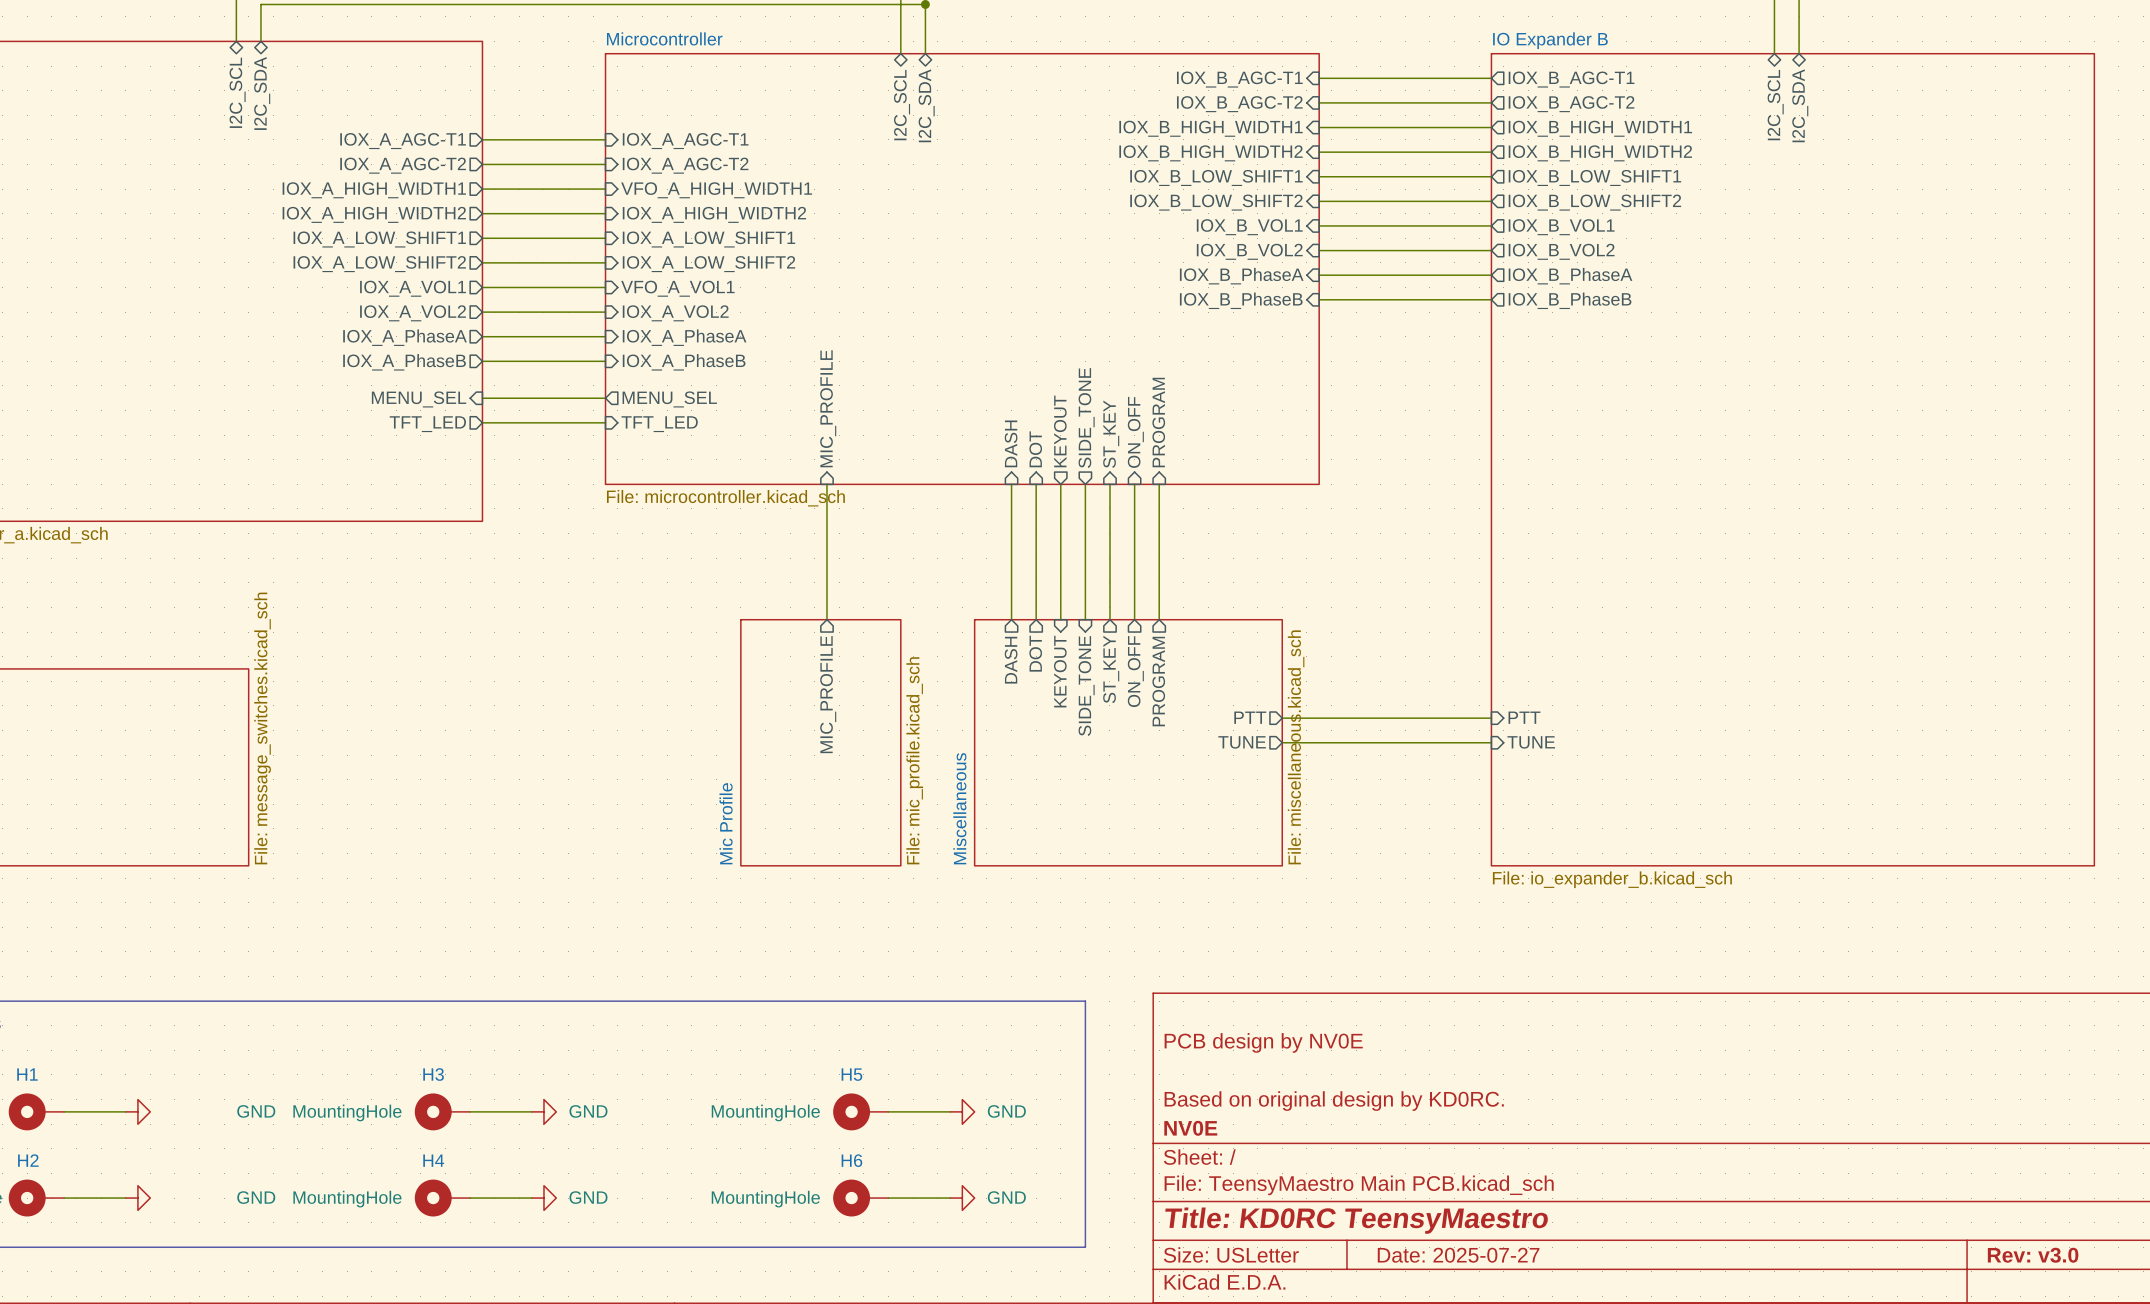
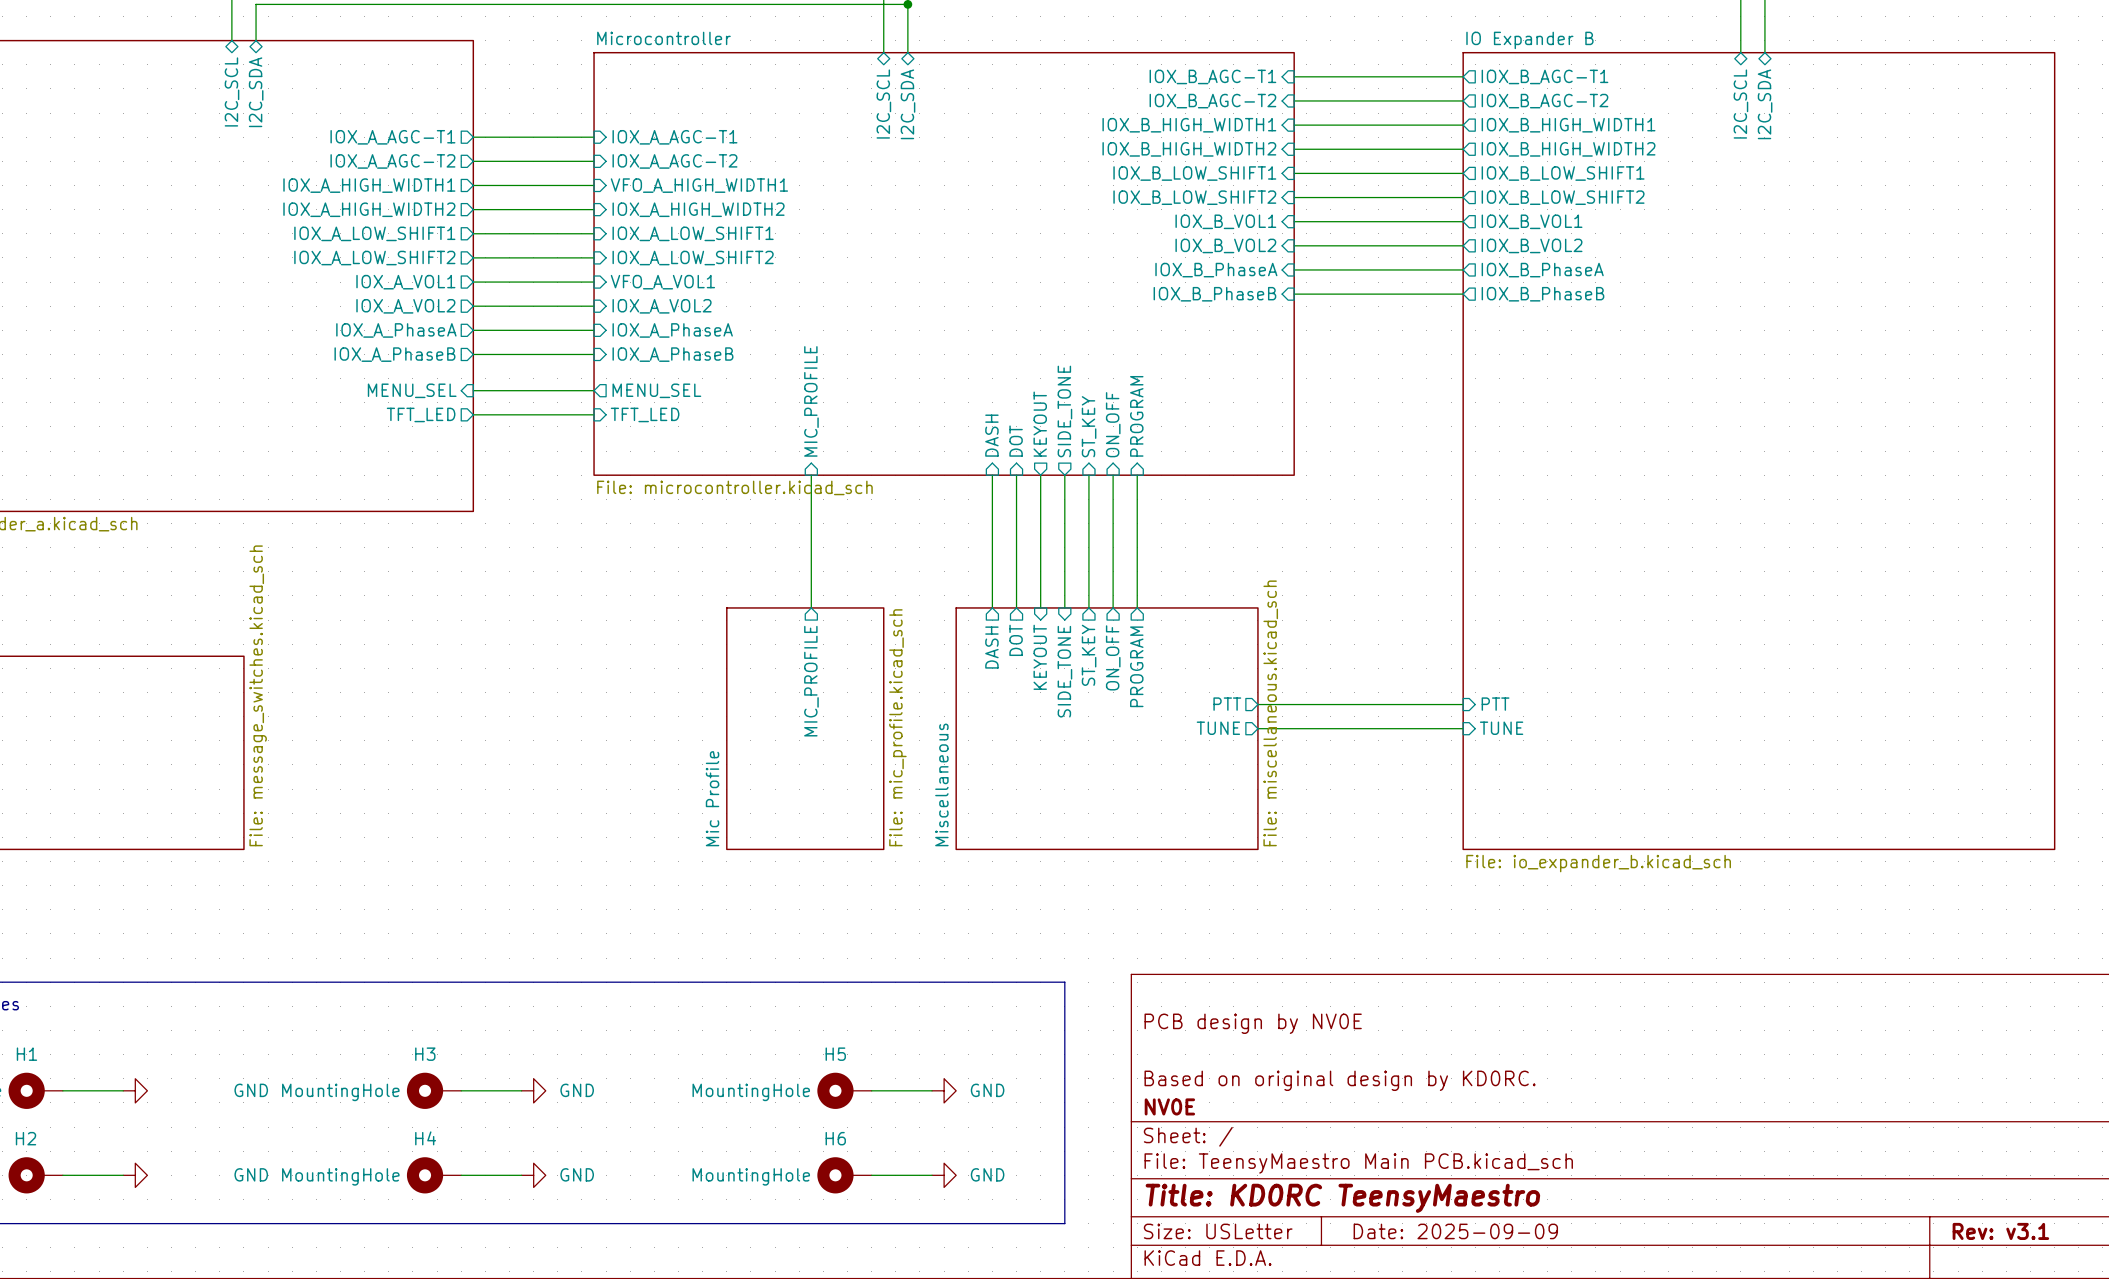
title block: Date: 2025-07-27 (1458, 1255) -> Date: 2025-09-09 (1455, 1231)
title block: Rev: v3.0 (2033, 1255) -> Rev: v3.1 (2000, 1231)

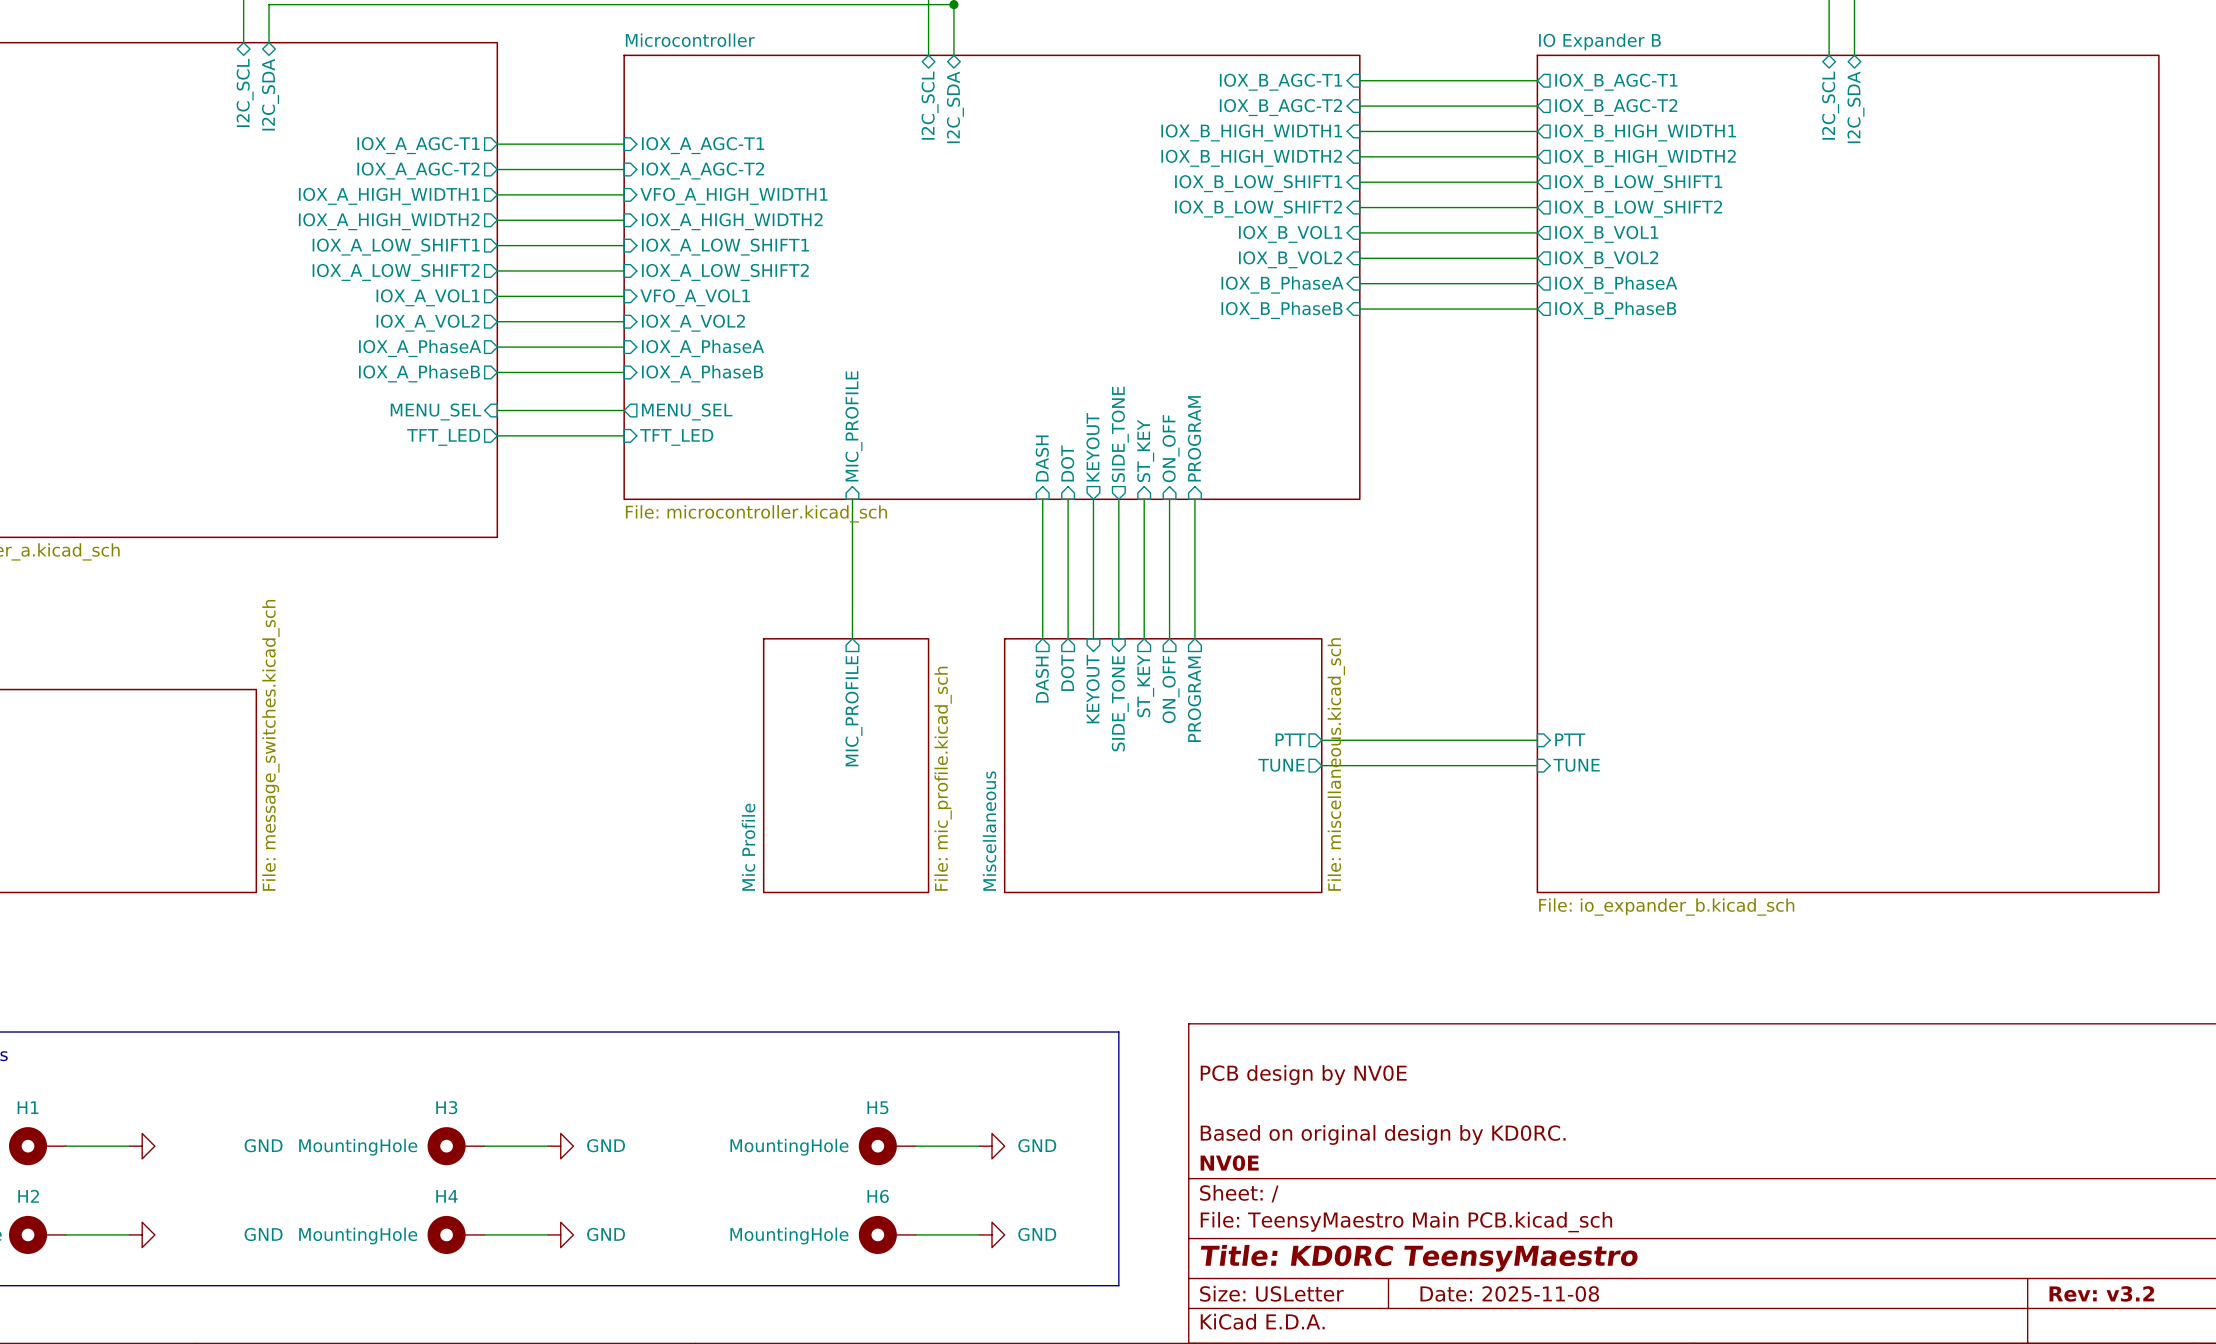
title block: Date: 2025-09-09 (1455, 1231) -> Date: 2025-11-08 (1509, 1293)
title block: Rev: v3.1 (2000, 1231) -> Rev: v3.2 (2101, 1293)

